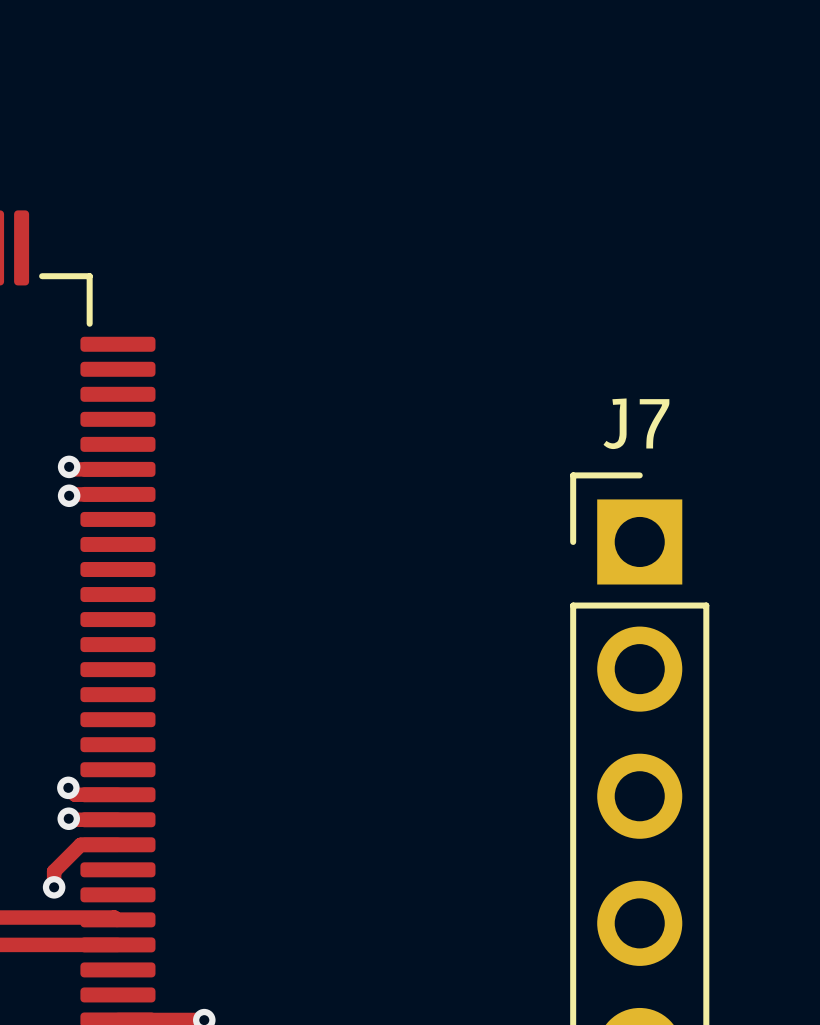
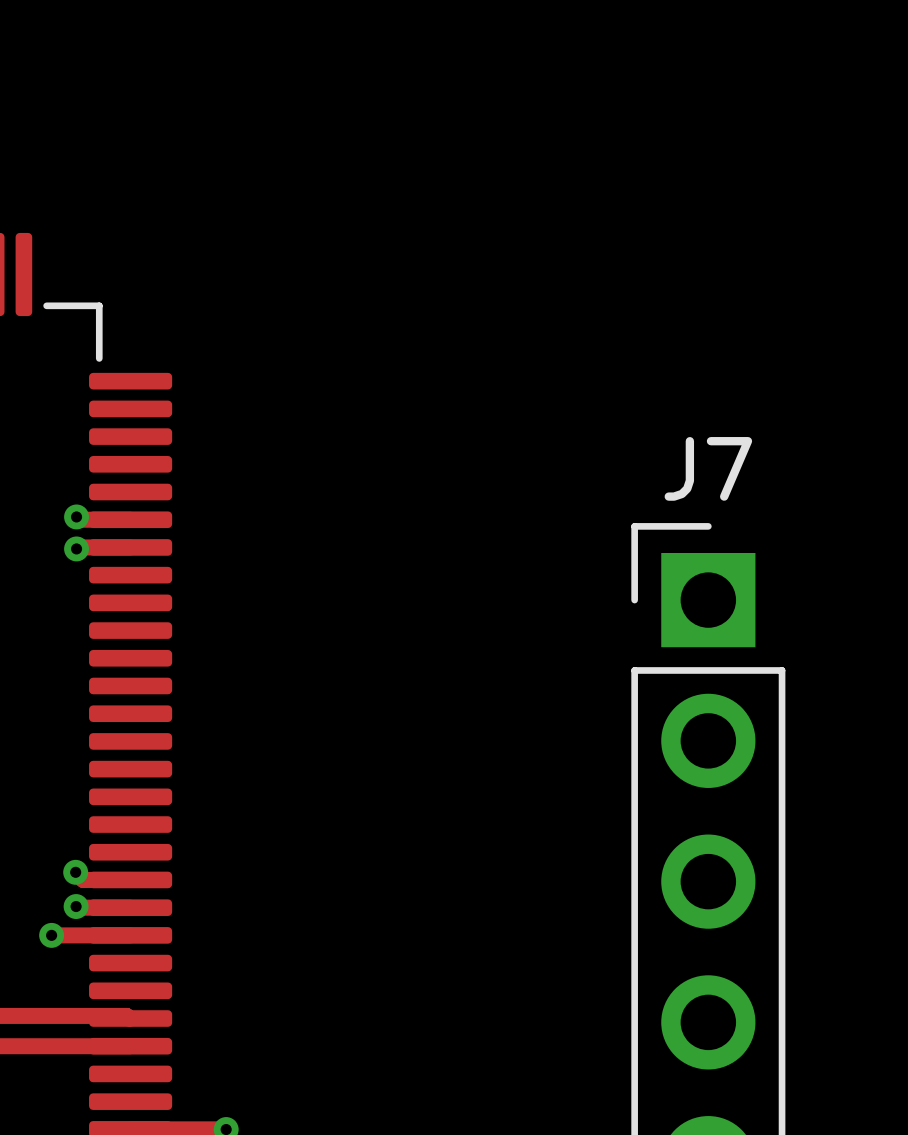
track: (80, 844) (54, 871) (54, 887) -> (89, 935) (51, 935)
via position: (54, 887) -> (51, 935)

